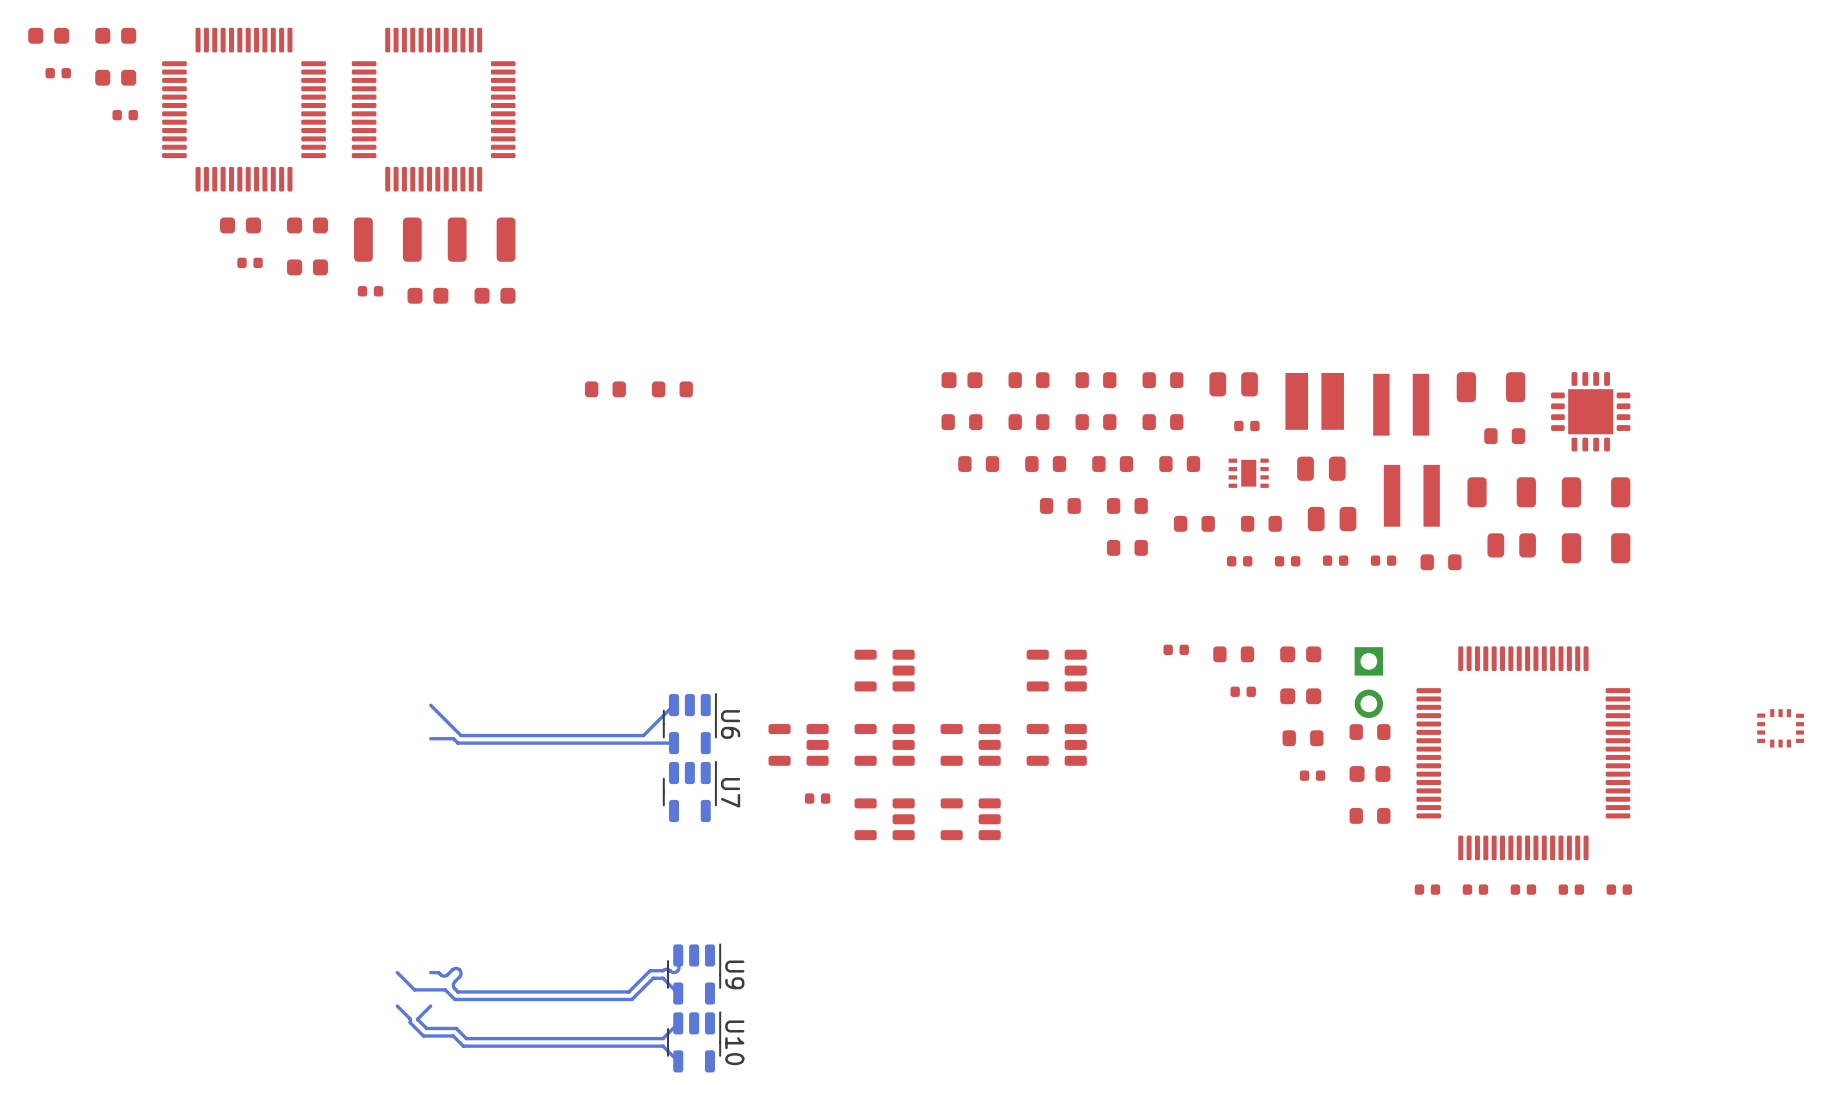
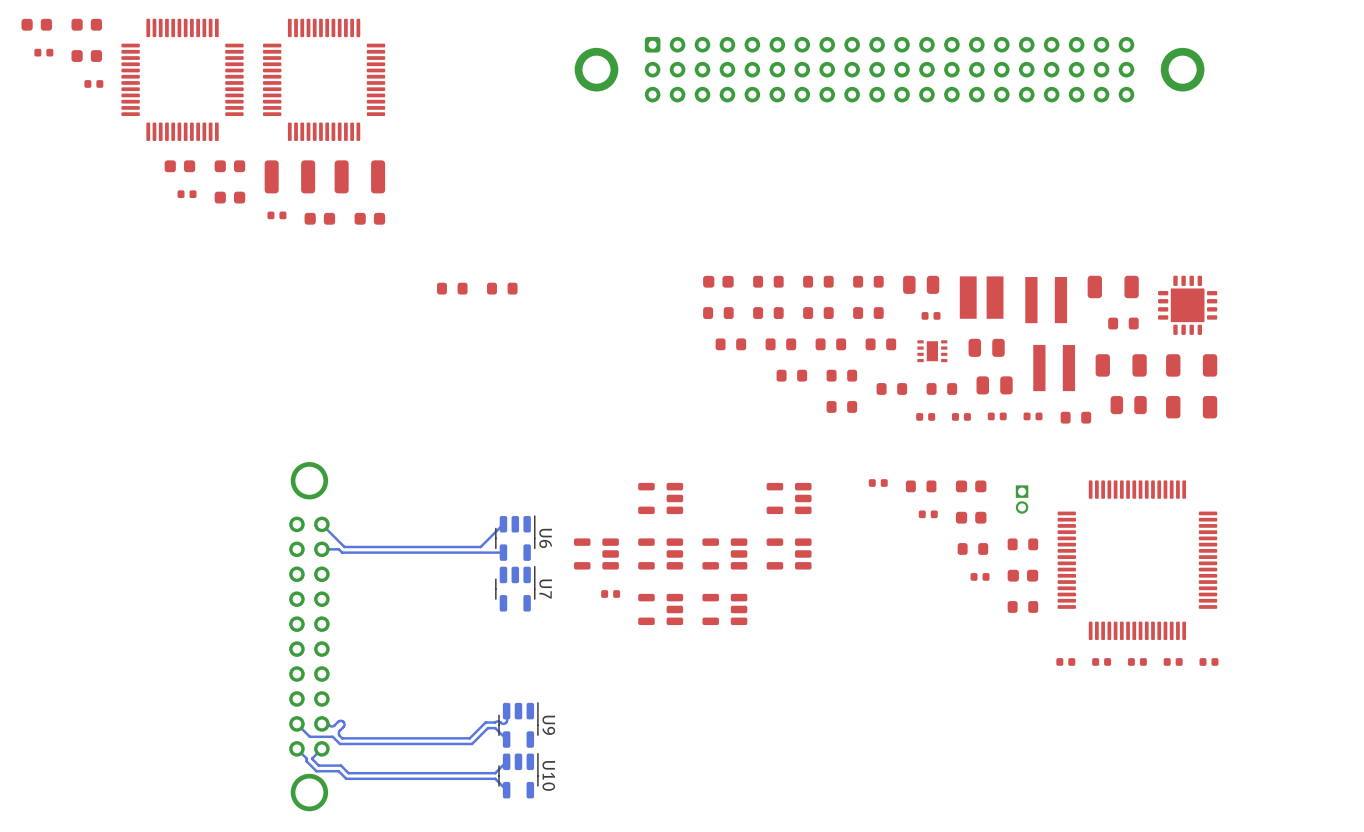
part: none -> (889, 69)
part footprint: [1354, 647, 1384, 719] -> [1015, 485, 1029, 514]
part: (1780, 728) -> none
part: none -> (309, 636)

